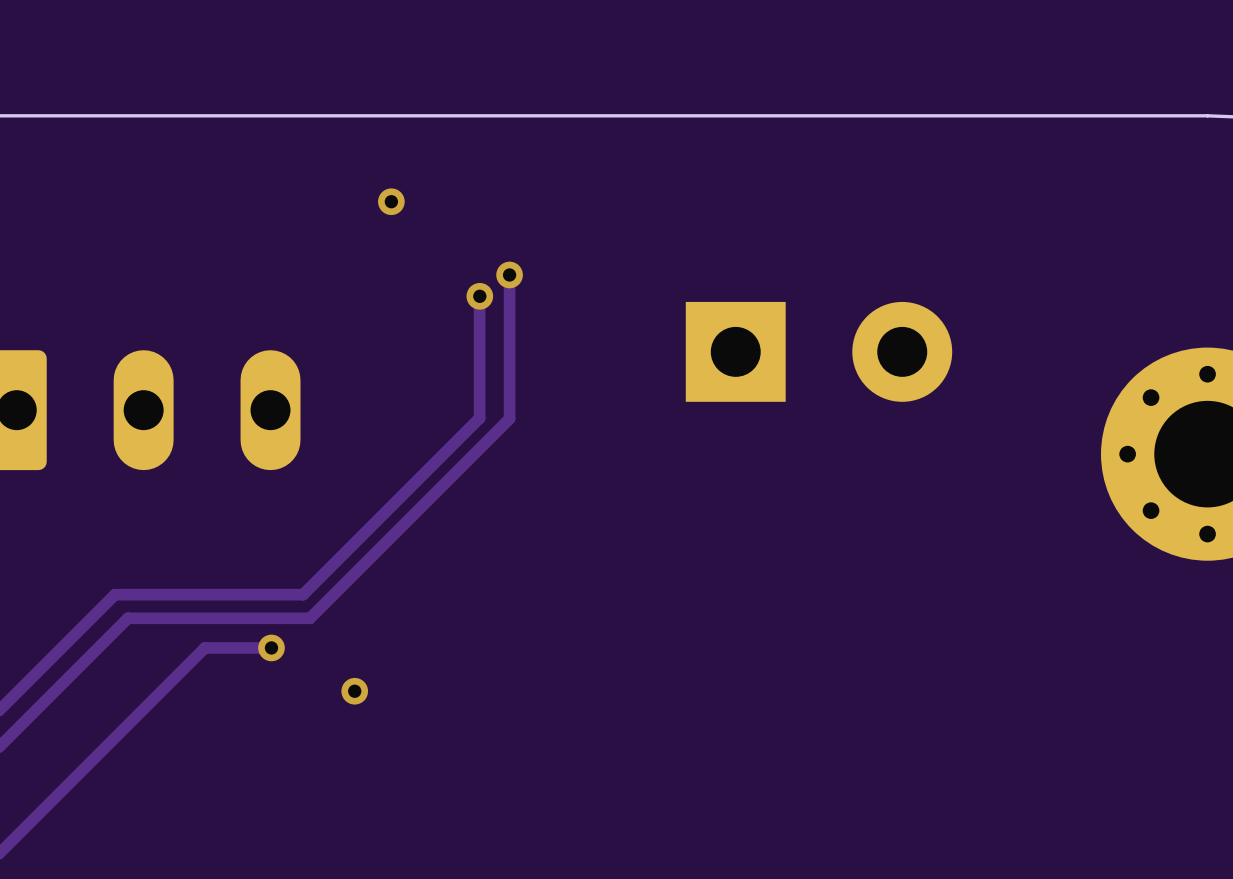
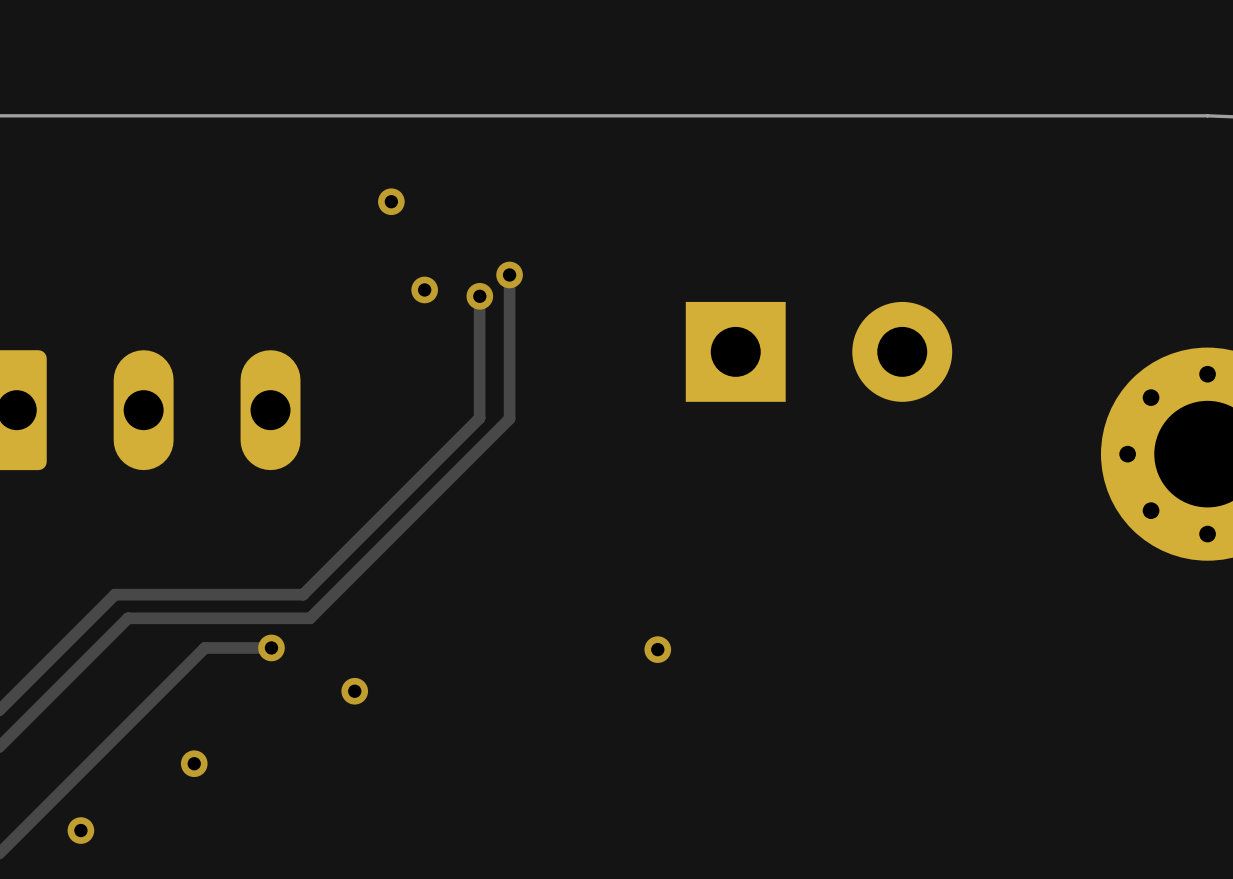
via: none -> (424, 289)
via: none -> (657, 649)
via: none -> (194, 763)
via: none -> (80, 830)

